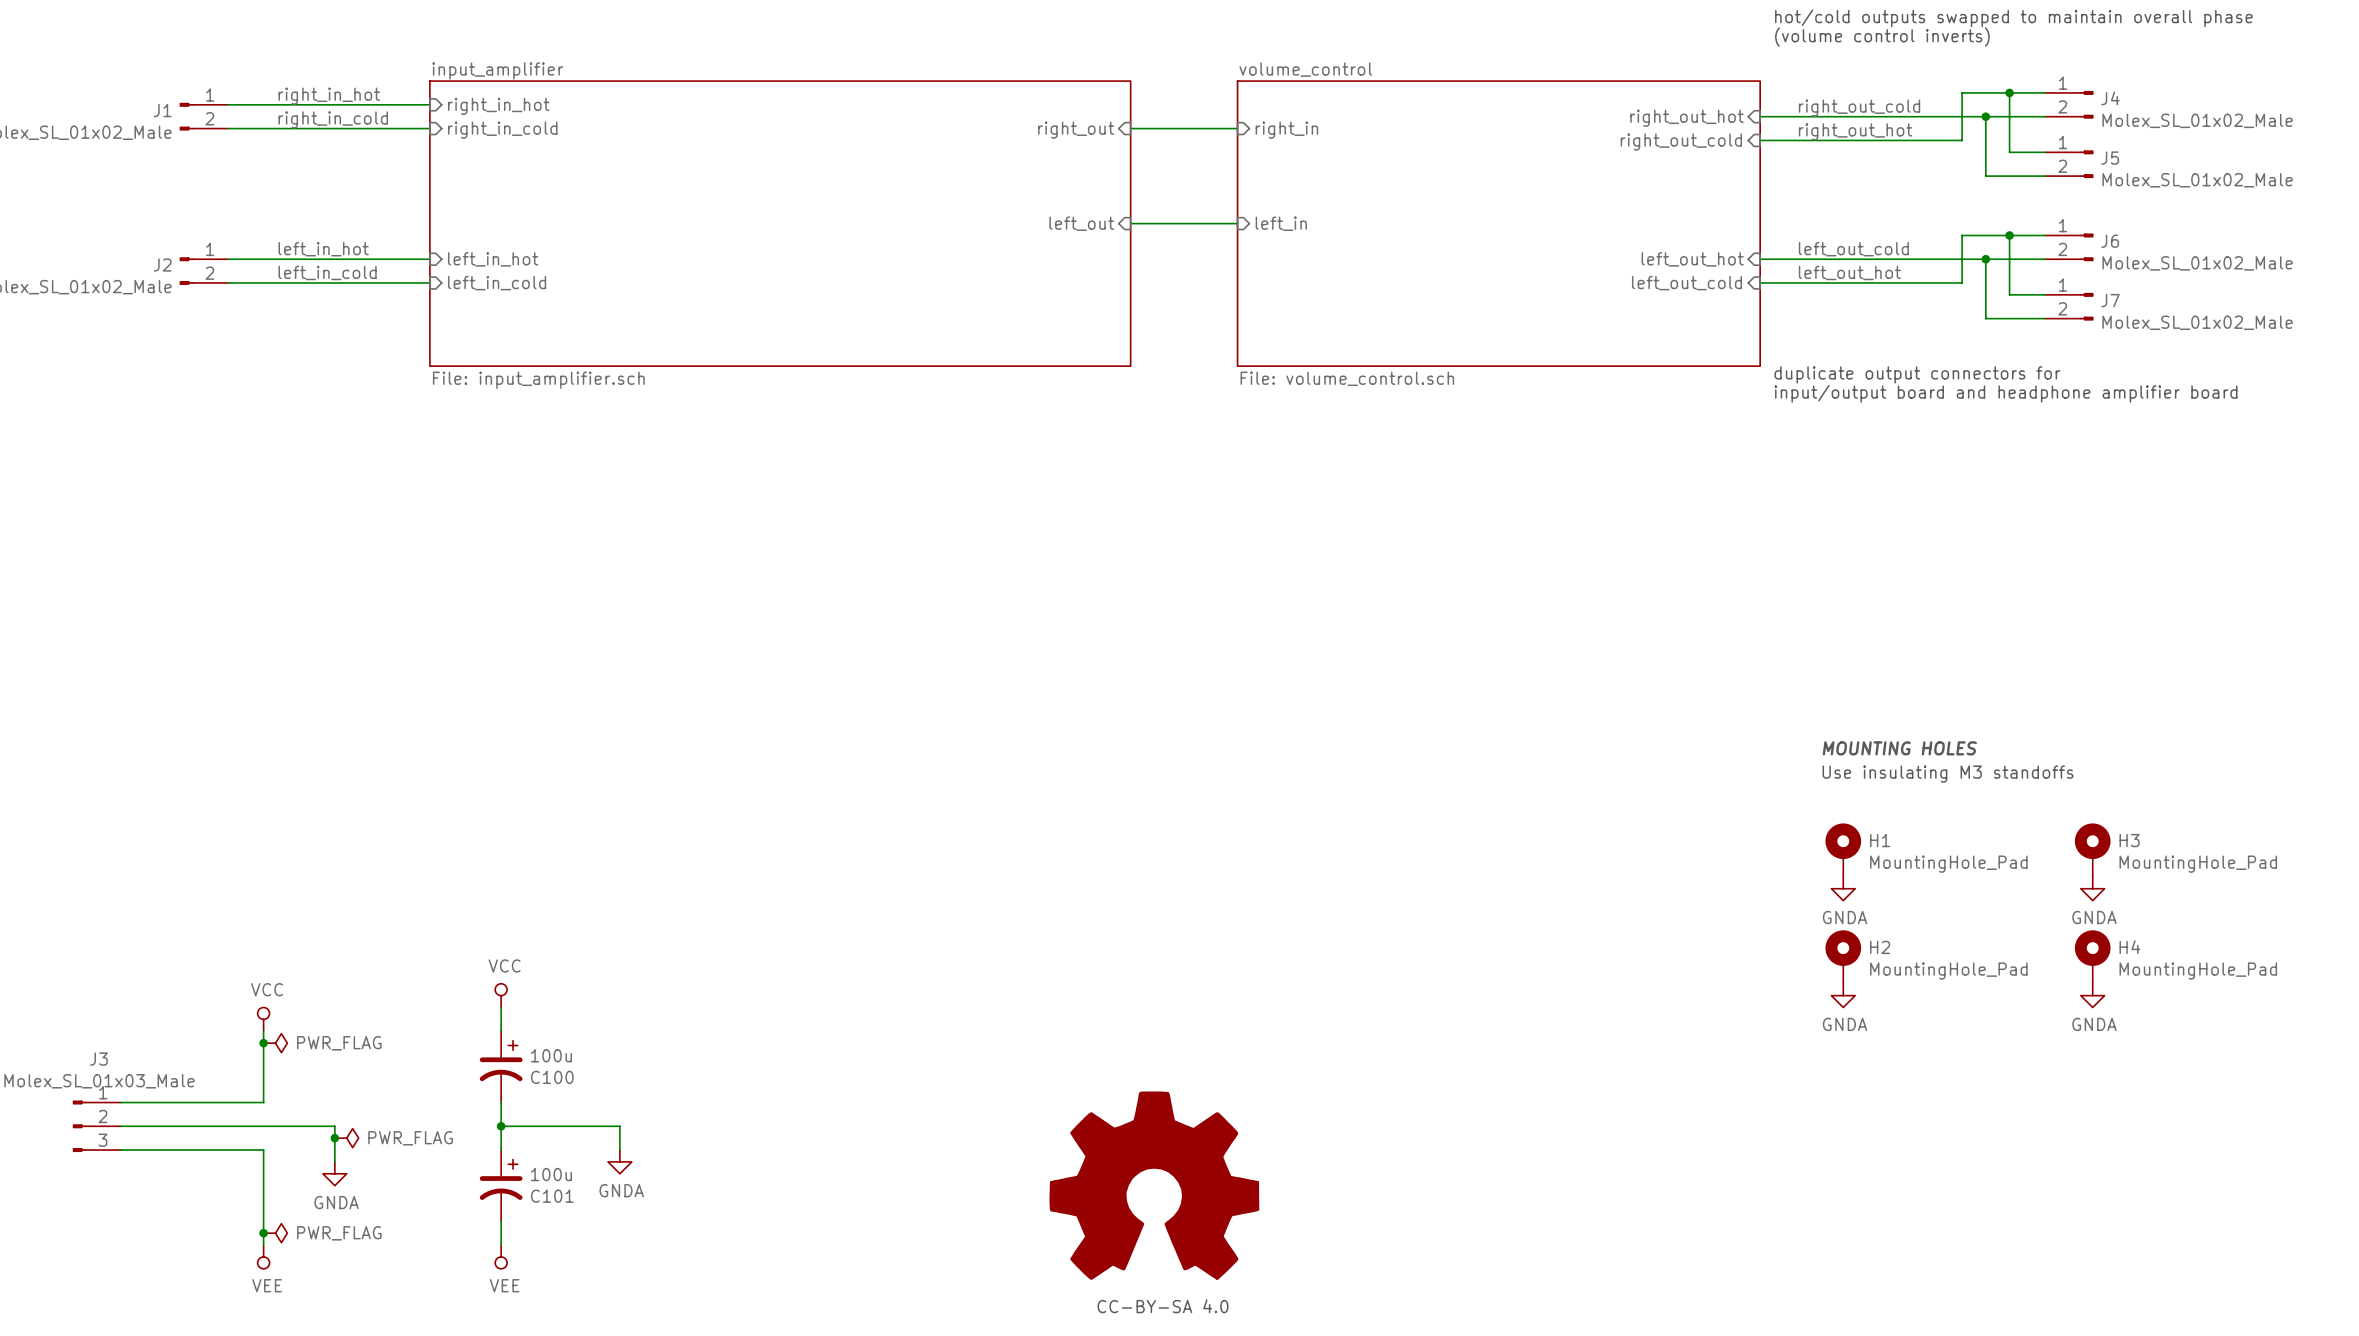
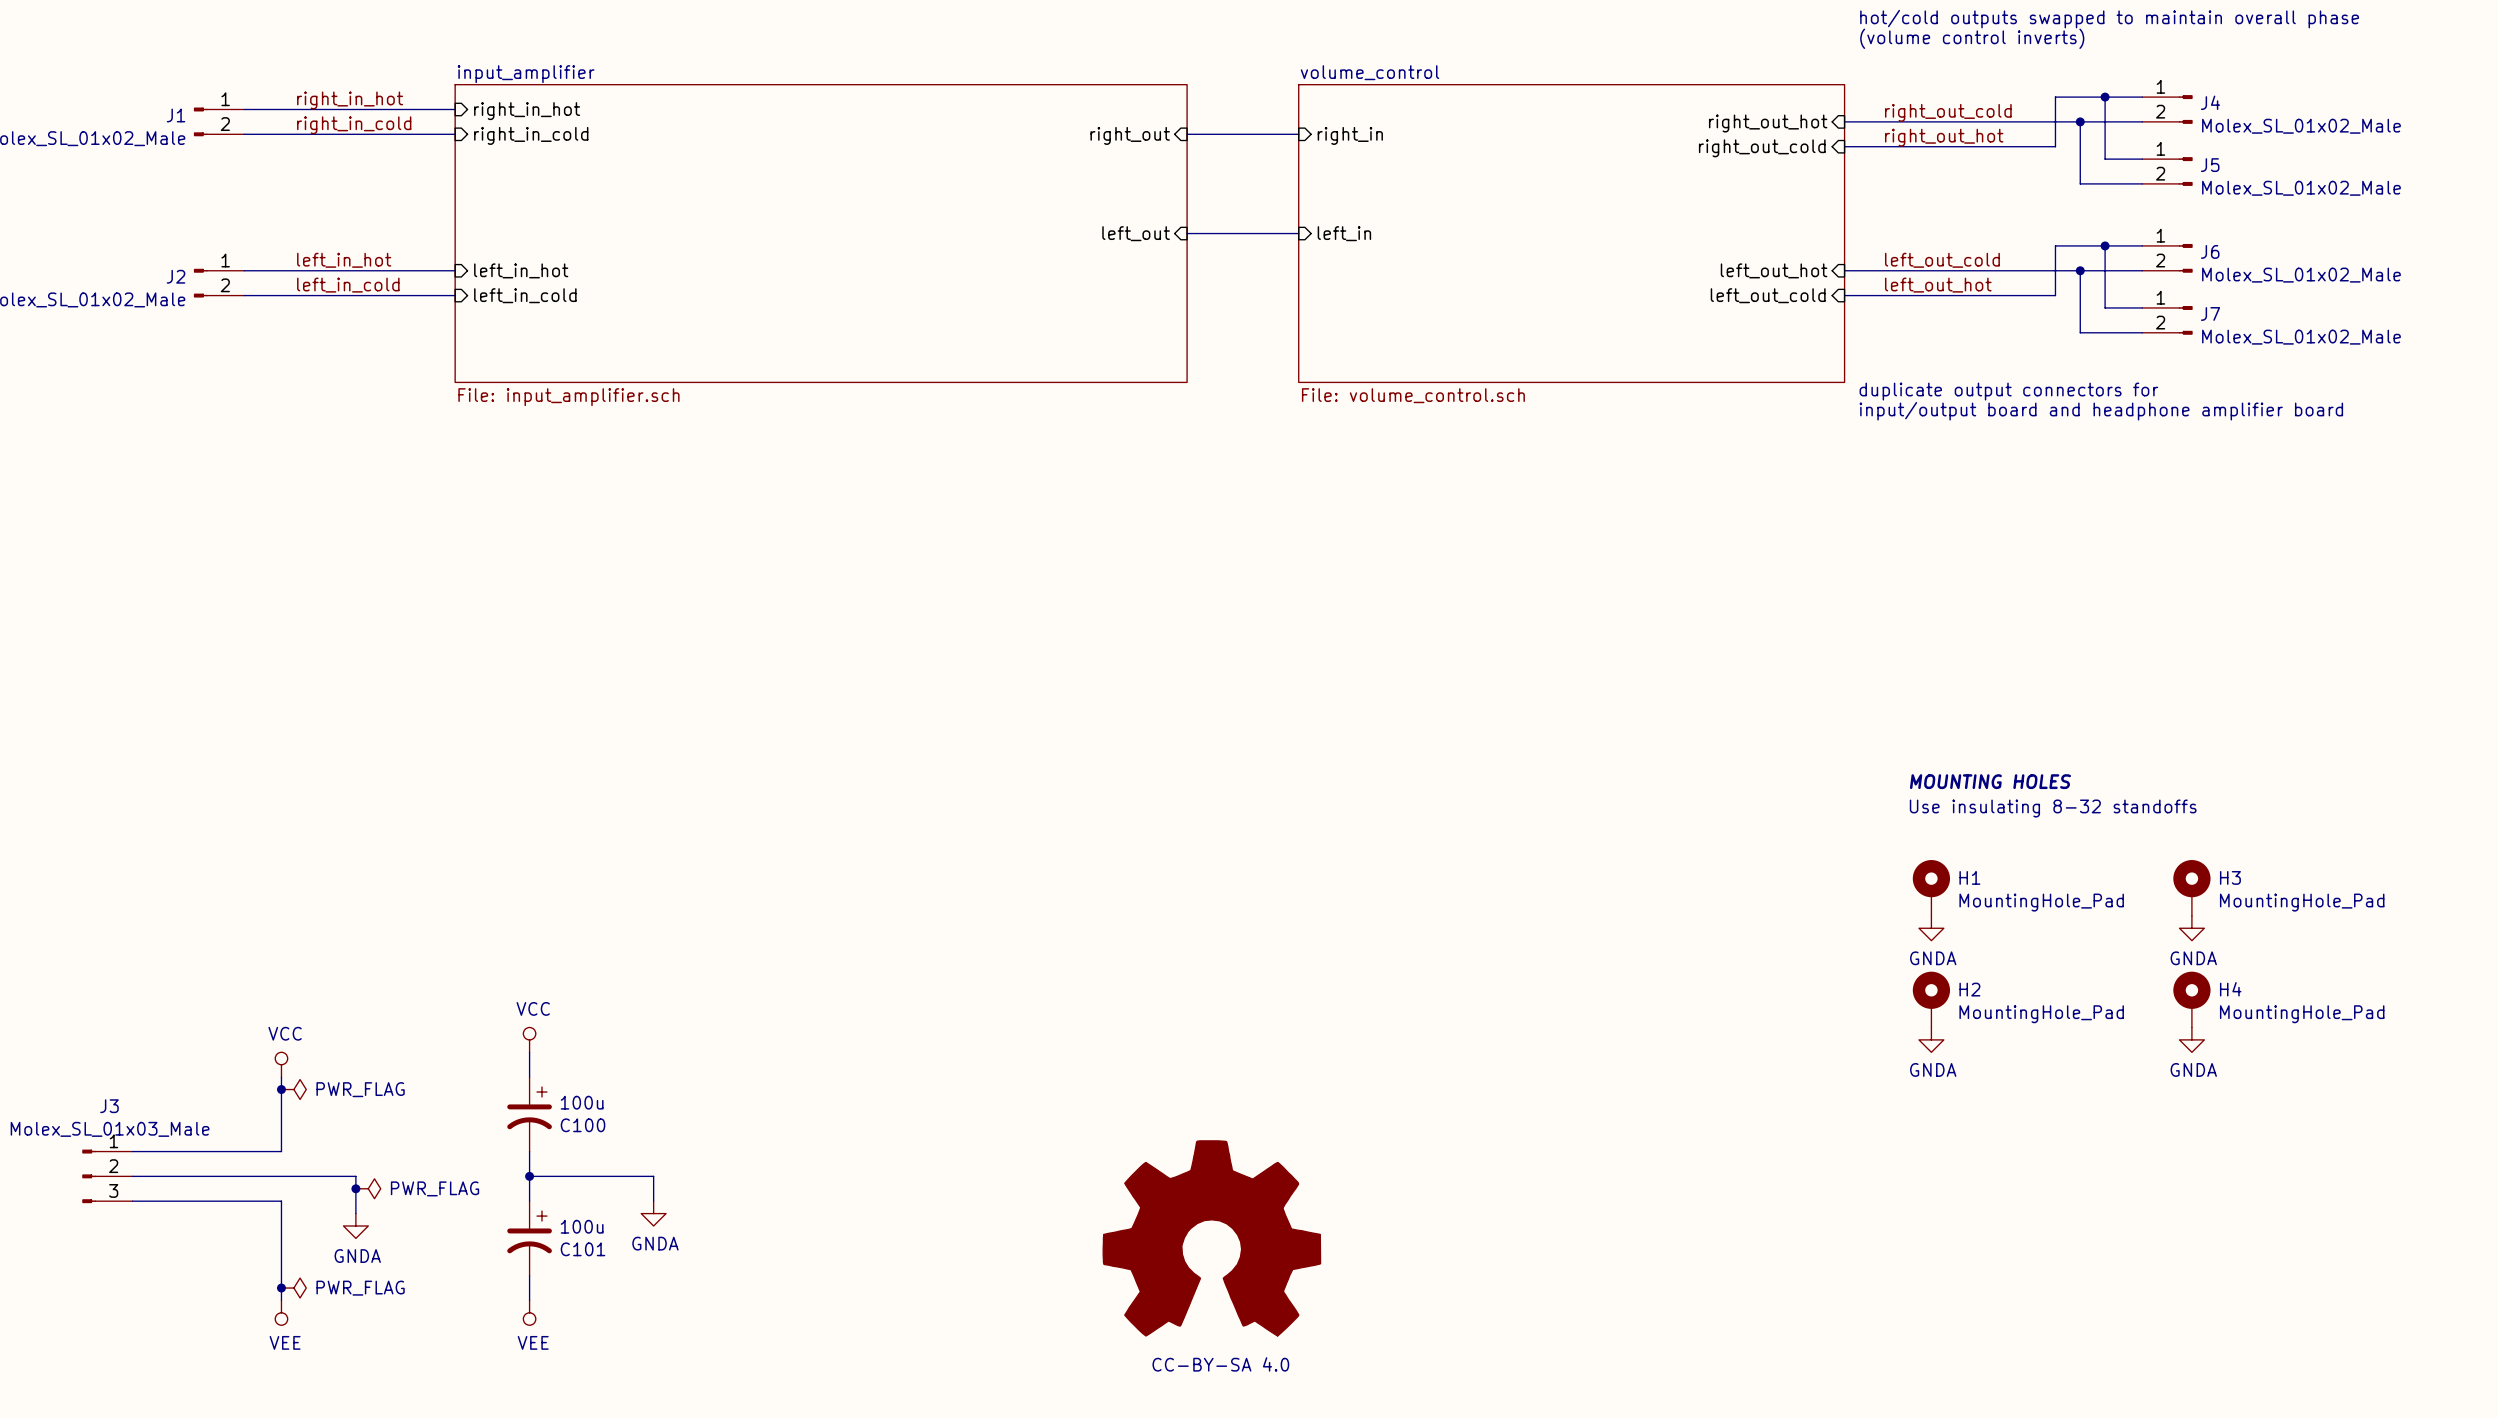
text: Use insulating M3 standoffs (1948, 774) -> Use insulating 8-32 standoffs (2053, 808)

